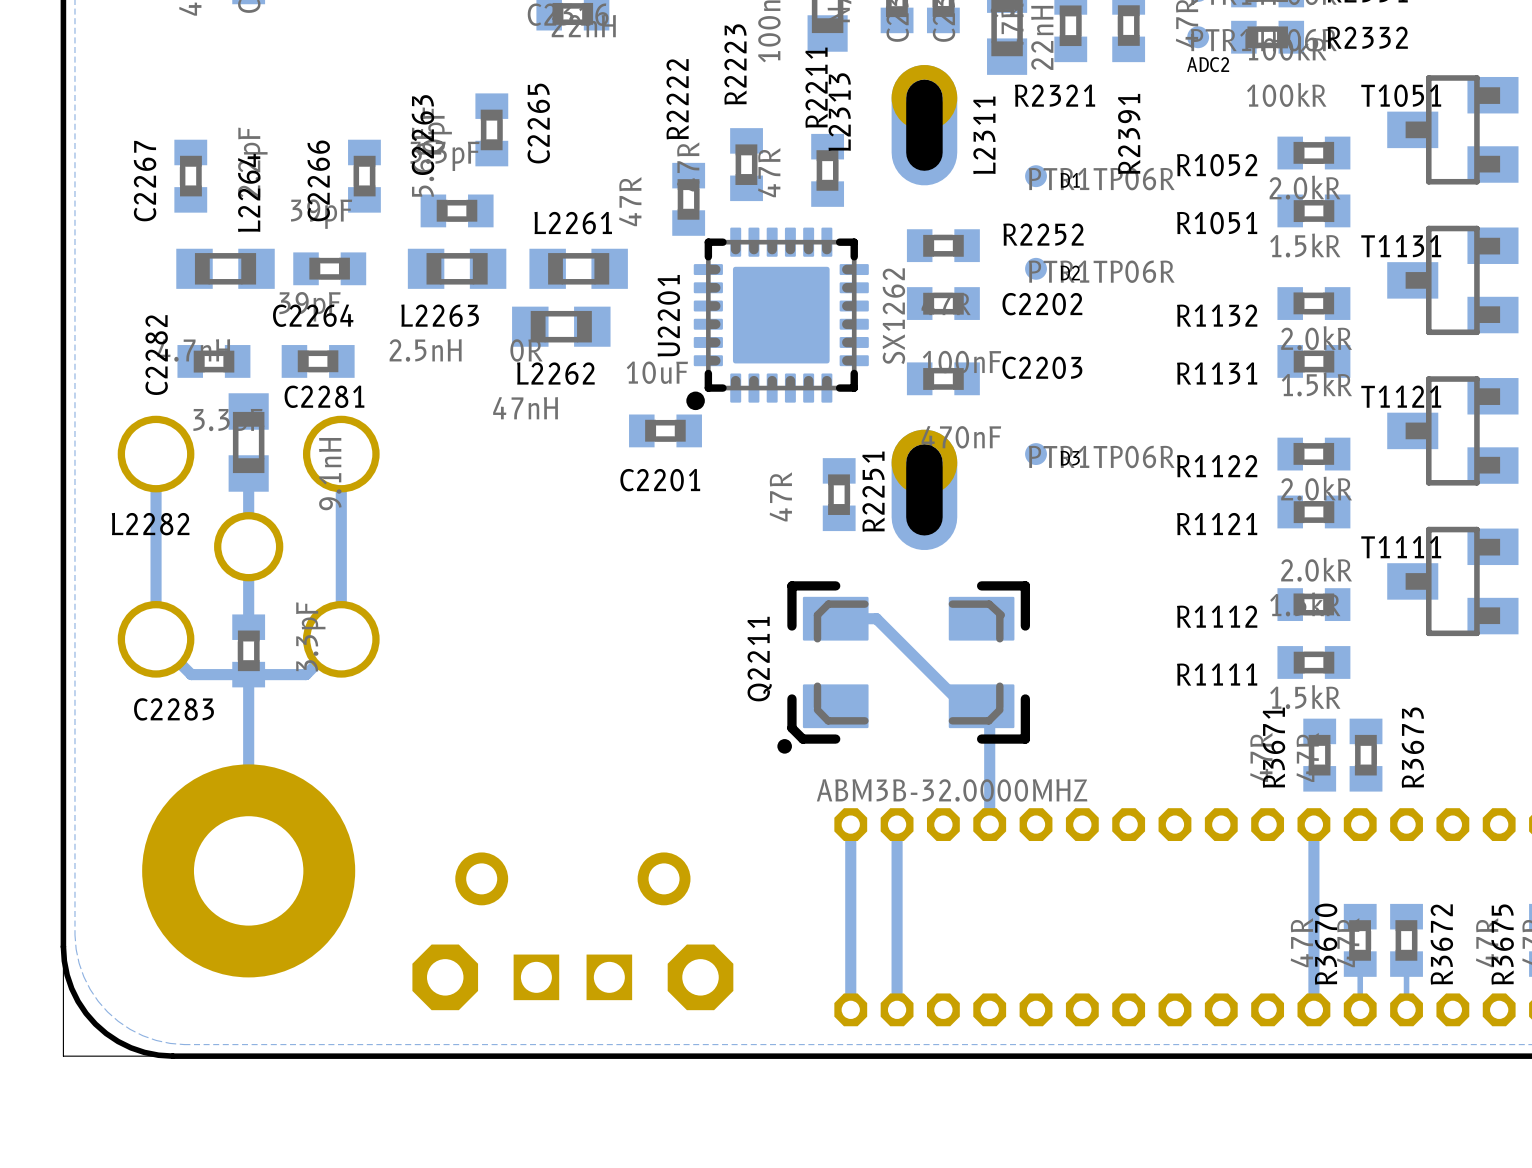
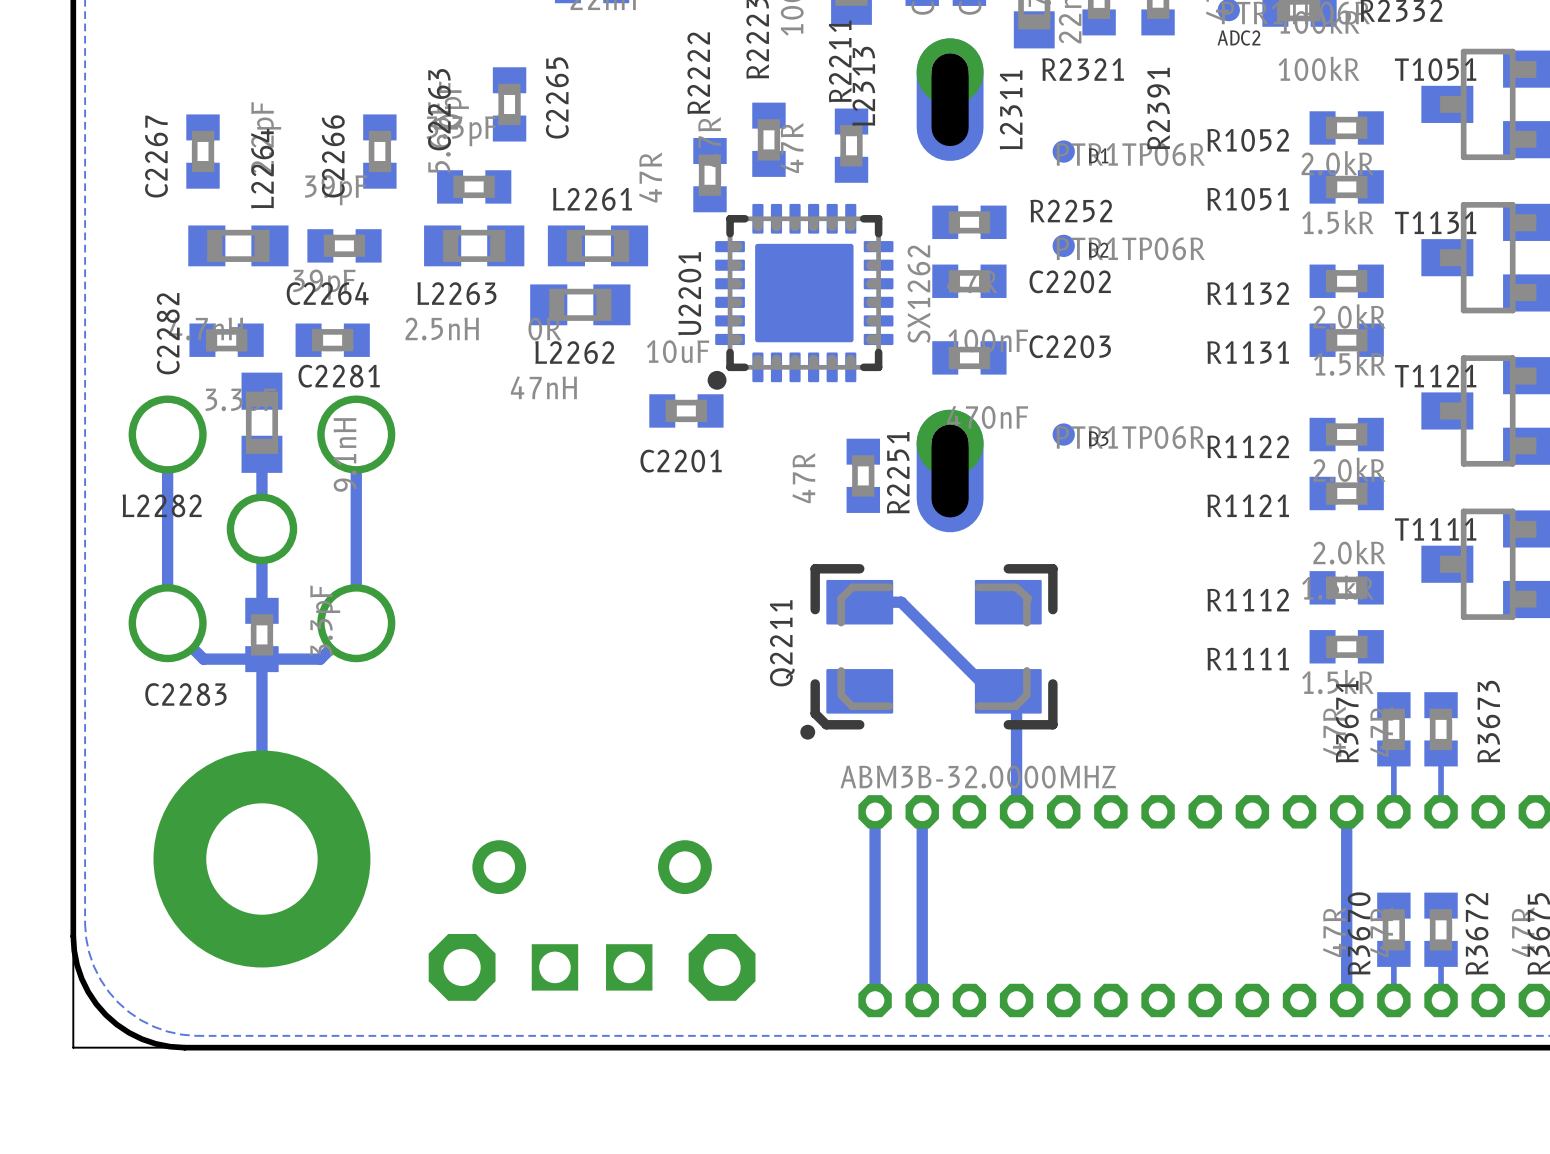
R3671 position: (1319, 755) -> (1393, 729)
R3673 position: (1366, 755) -> (1441, 729)
track: none -> (1393, 753) (1393, 811)
track: none -> (1441, 753) (1441, 811)

